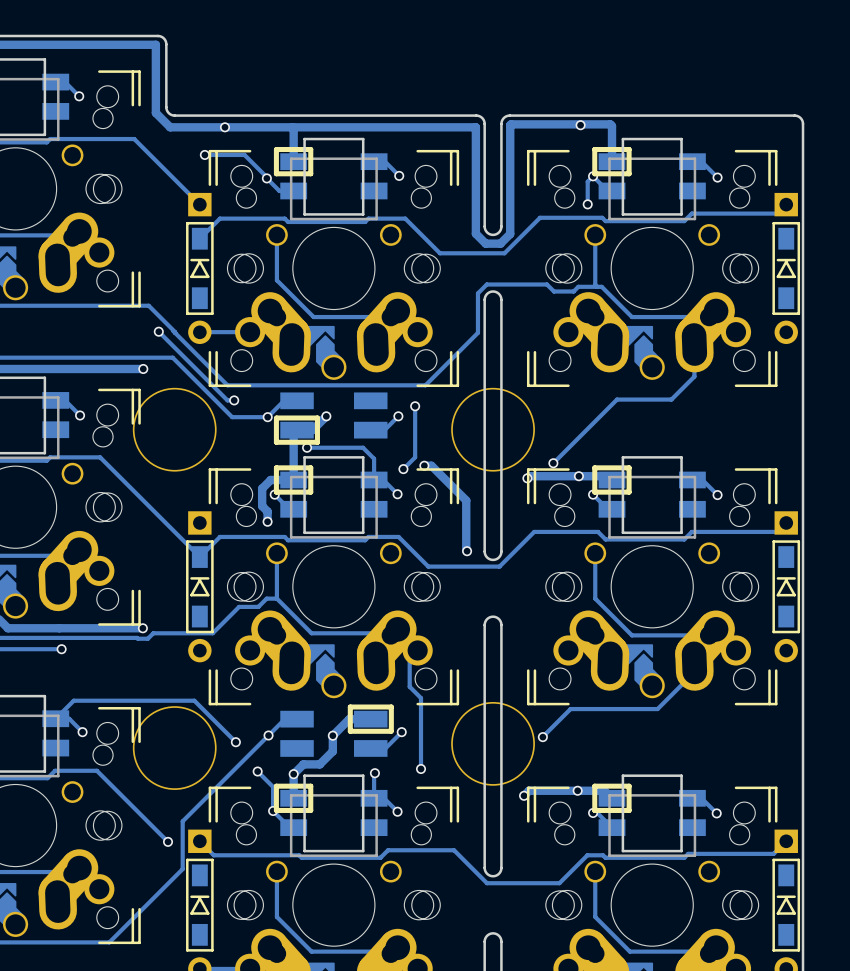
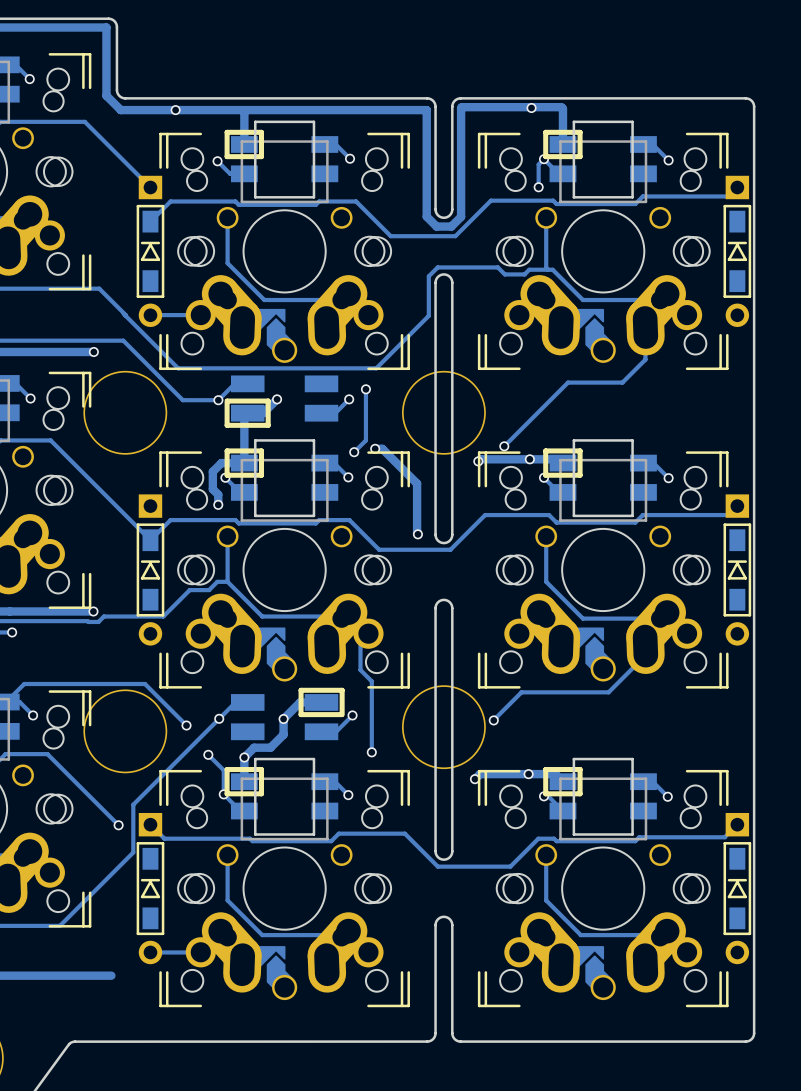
track: (204, 154) (244, 154) (266, 178) -> none
via: (204, 154) -> none
track: (158, 331) (227, 400) (234, 400) -> none
via: (158, 331) -> none
via: (234, 400) -> none
track: (307, 447) (363, 447) (374, 458) (374, 479) -> none
via: (307, 447) -> none
track: (374, 773) (374, 798) -> none
via: (374, 773) -> none

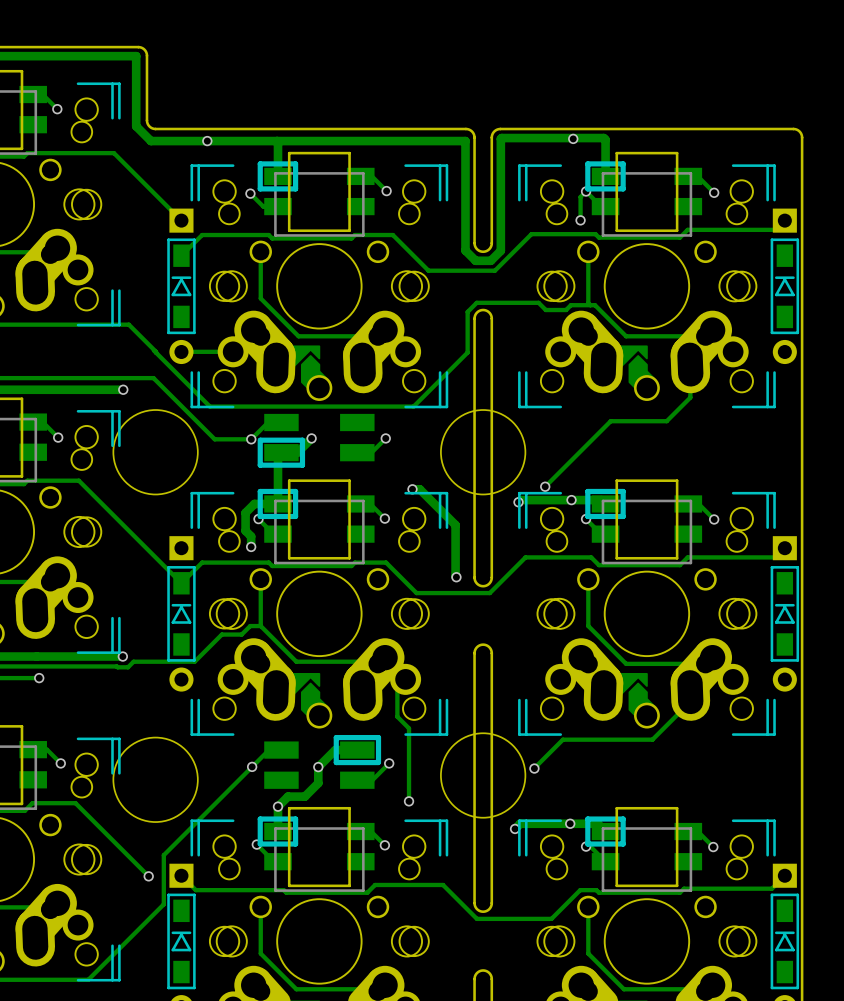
track: (365, 389) (365, 440) (354, 452) -> none
via: (365, 389) -> none
via: (354, 452) -> none
track: (6, 702) (24, 684) (145, 684) (186, 725) -> none
via: (186, 725) -> none
track: (208, 754) (223, 770) (223, 794) -> none
via: (208, 754) -> none

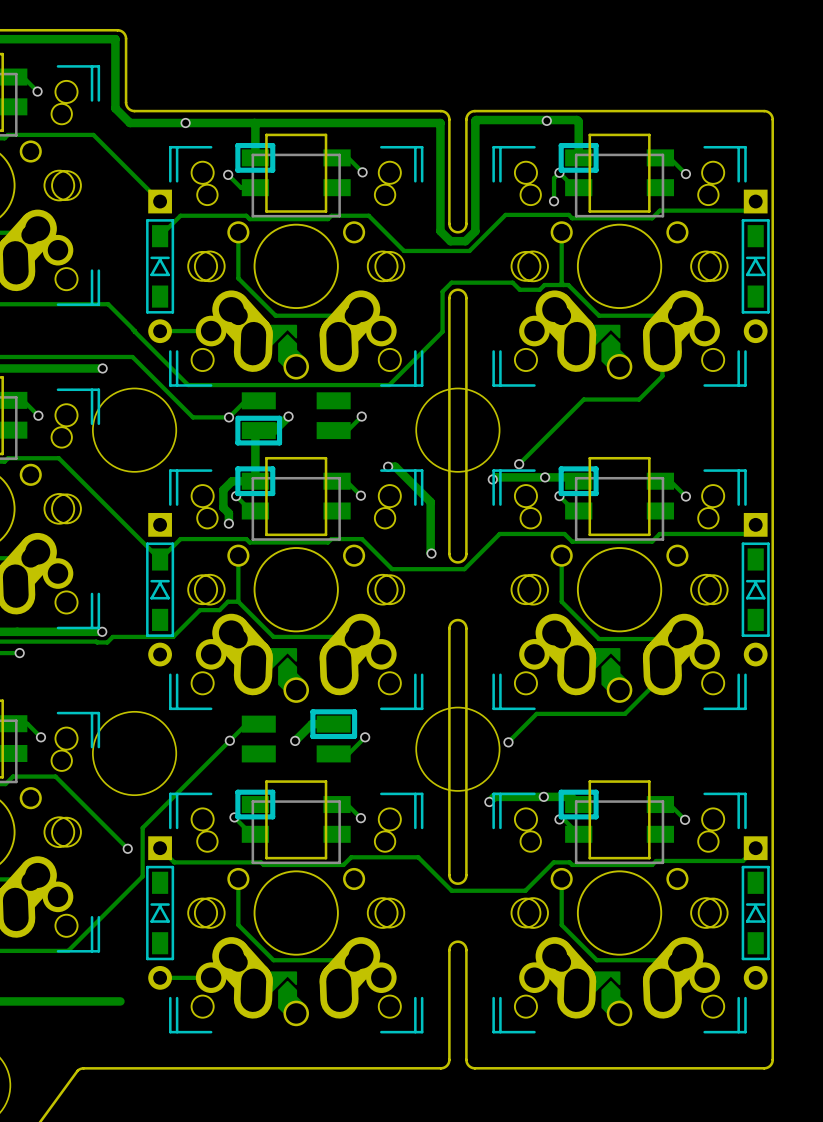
track: (405, 679) (397, 687) (397, 716) (409, 728) (409, 801) -> none
track: (318, 767) (318, 783) (304, 796) (288, 796) (278, 806) (278, 831) -> none
via: (409, 801) -> none
via: (278, 806) -> none

